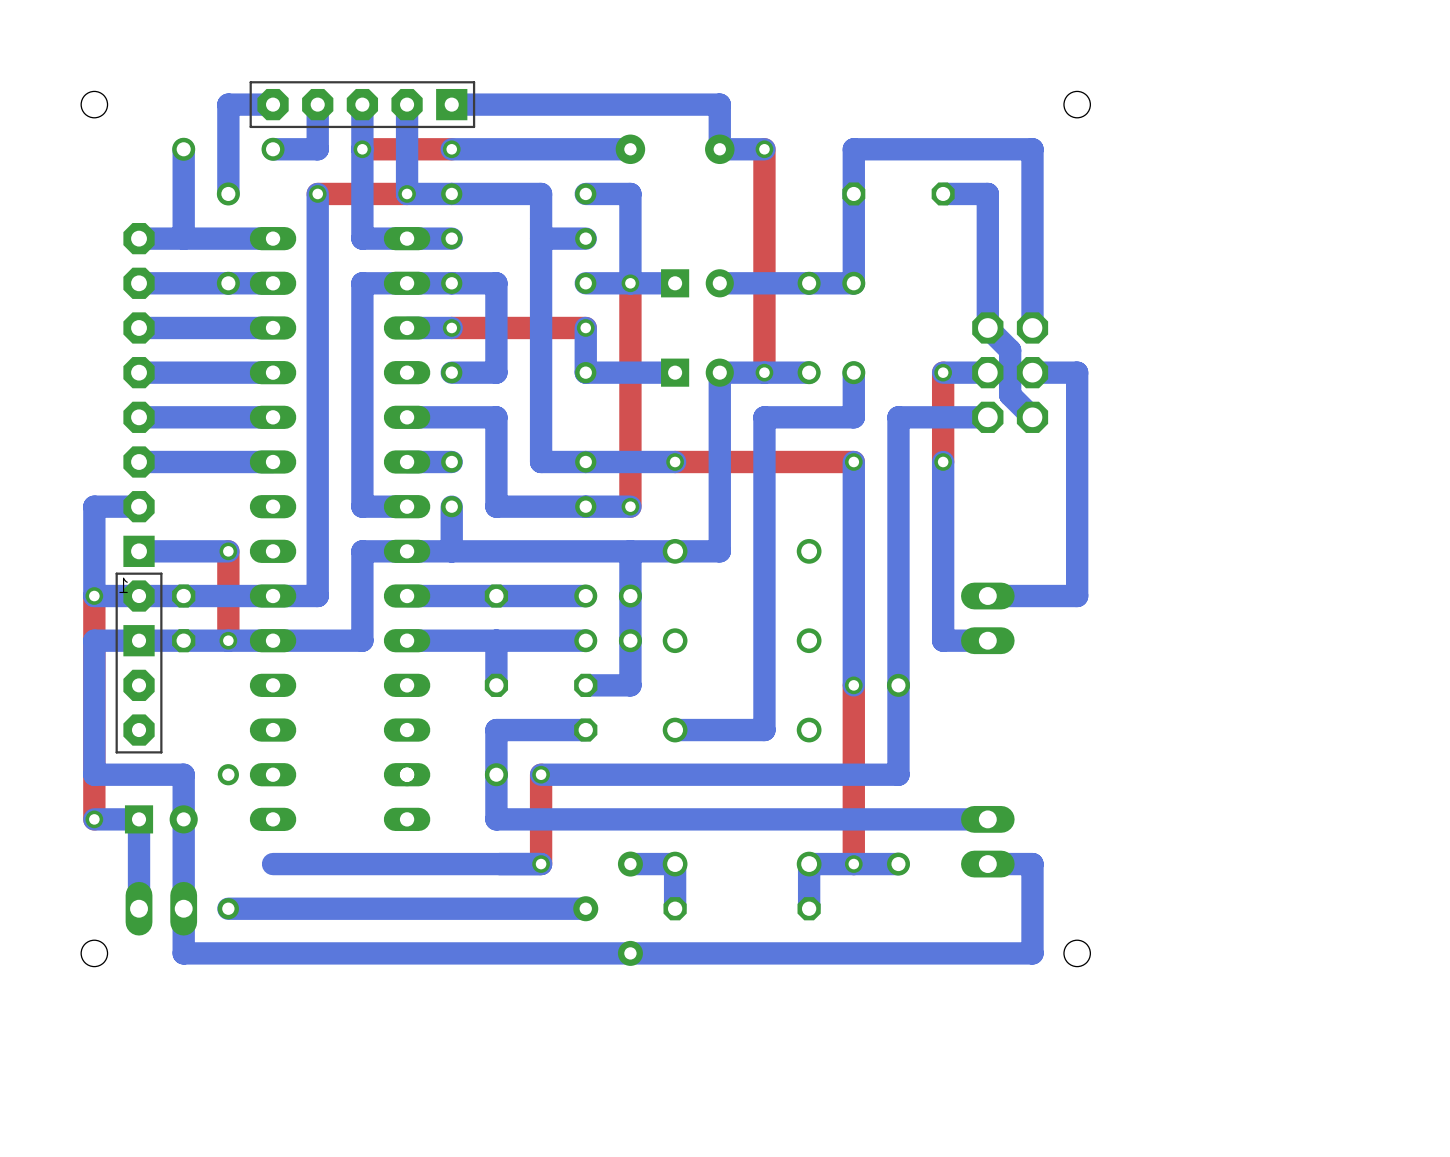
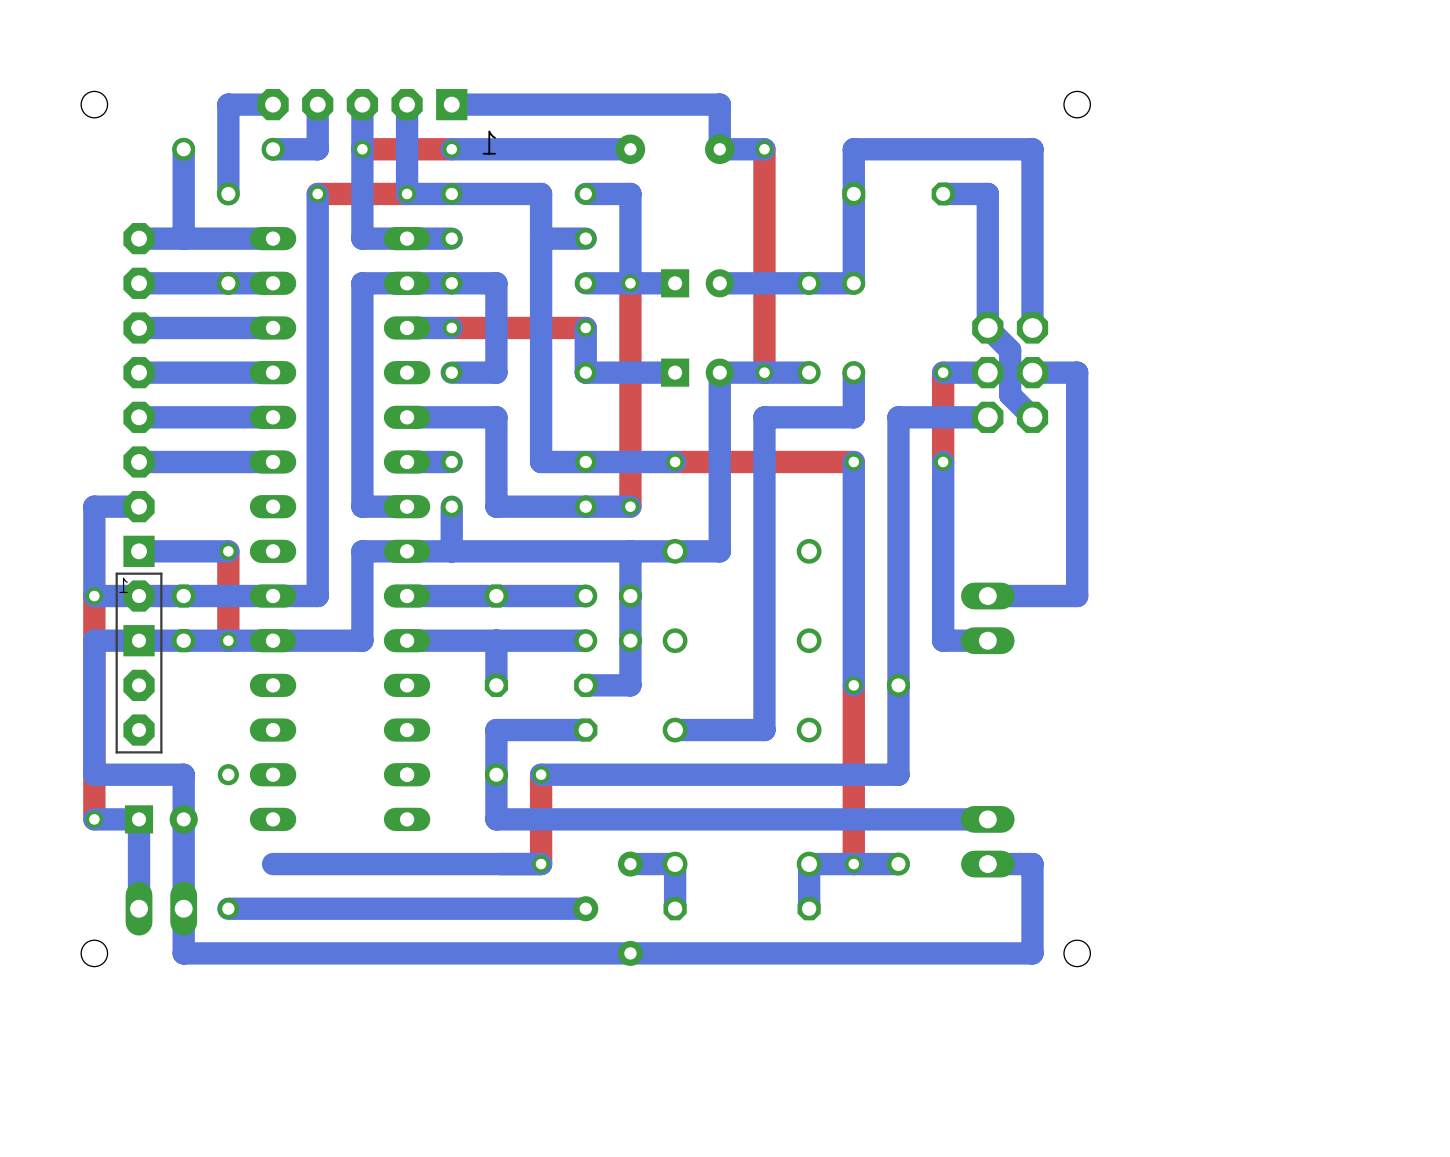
part footprint: [249, 81, 476, 129] -> [257, 88, 468, 121]

